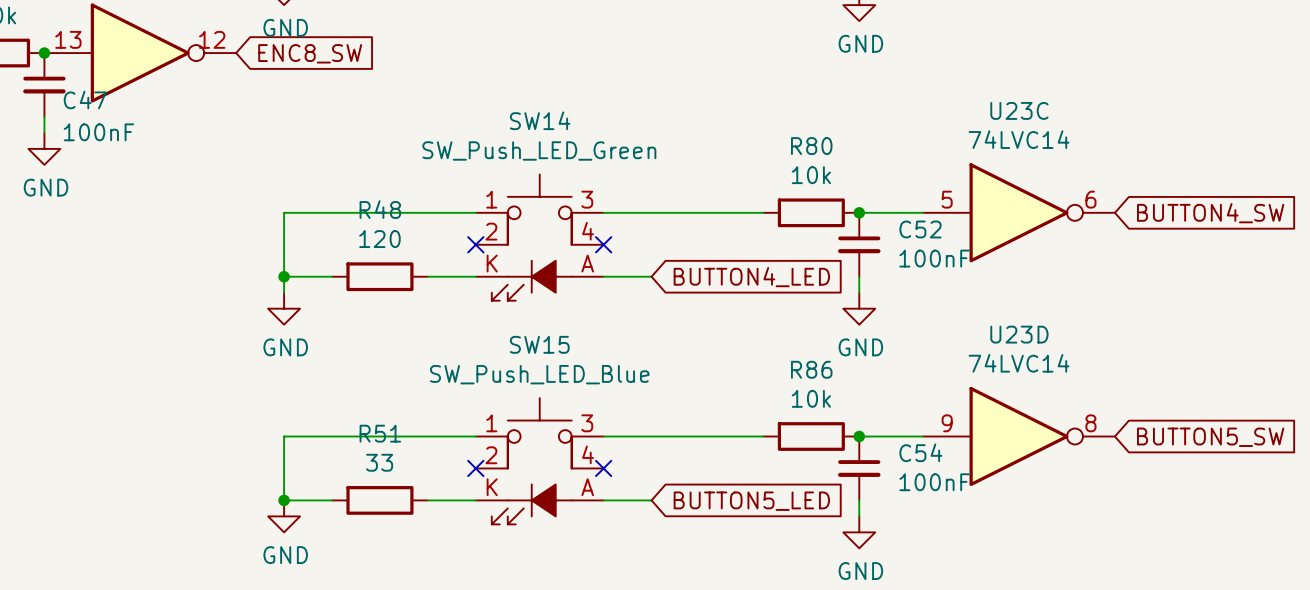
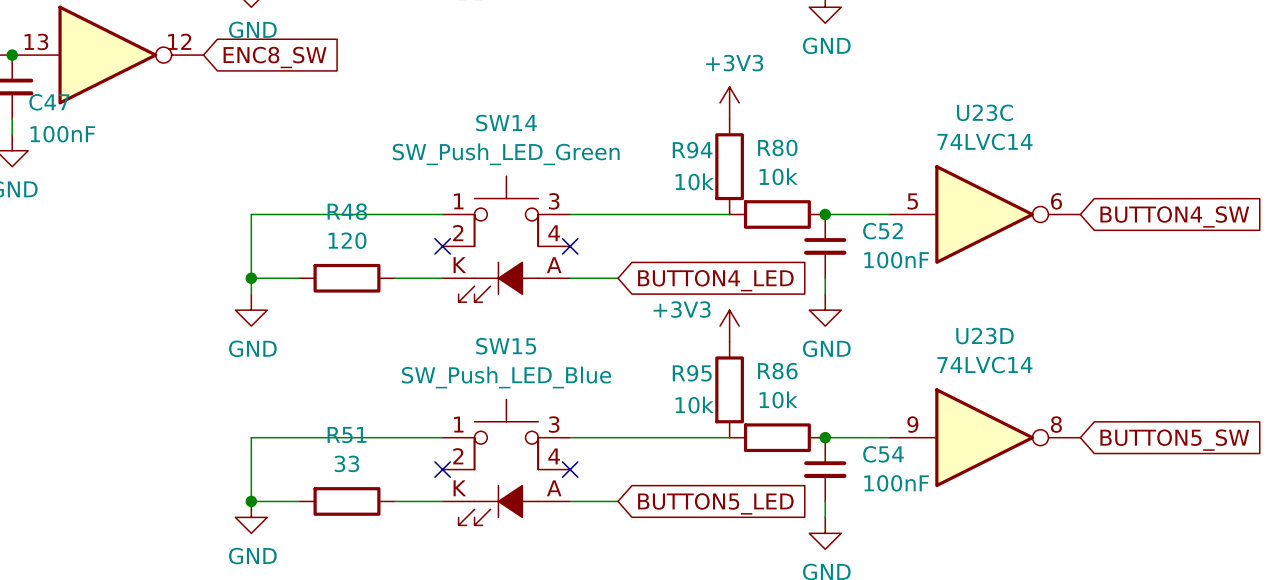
power symbol: none -> +3V3 (729, 102)
R94: none -> 10k (729, 166)
power symbol: none -> +3V3 (729, 326)
R95: none -> 10k (729, 389)

